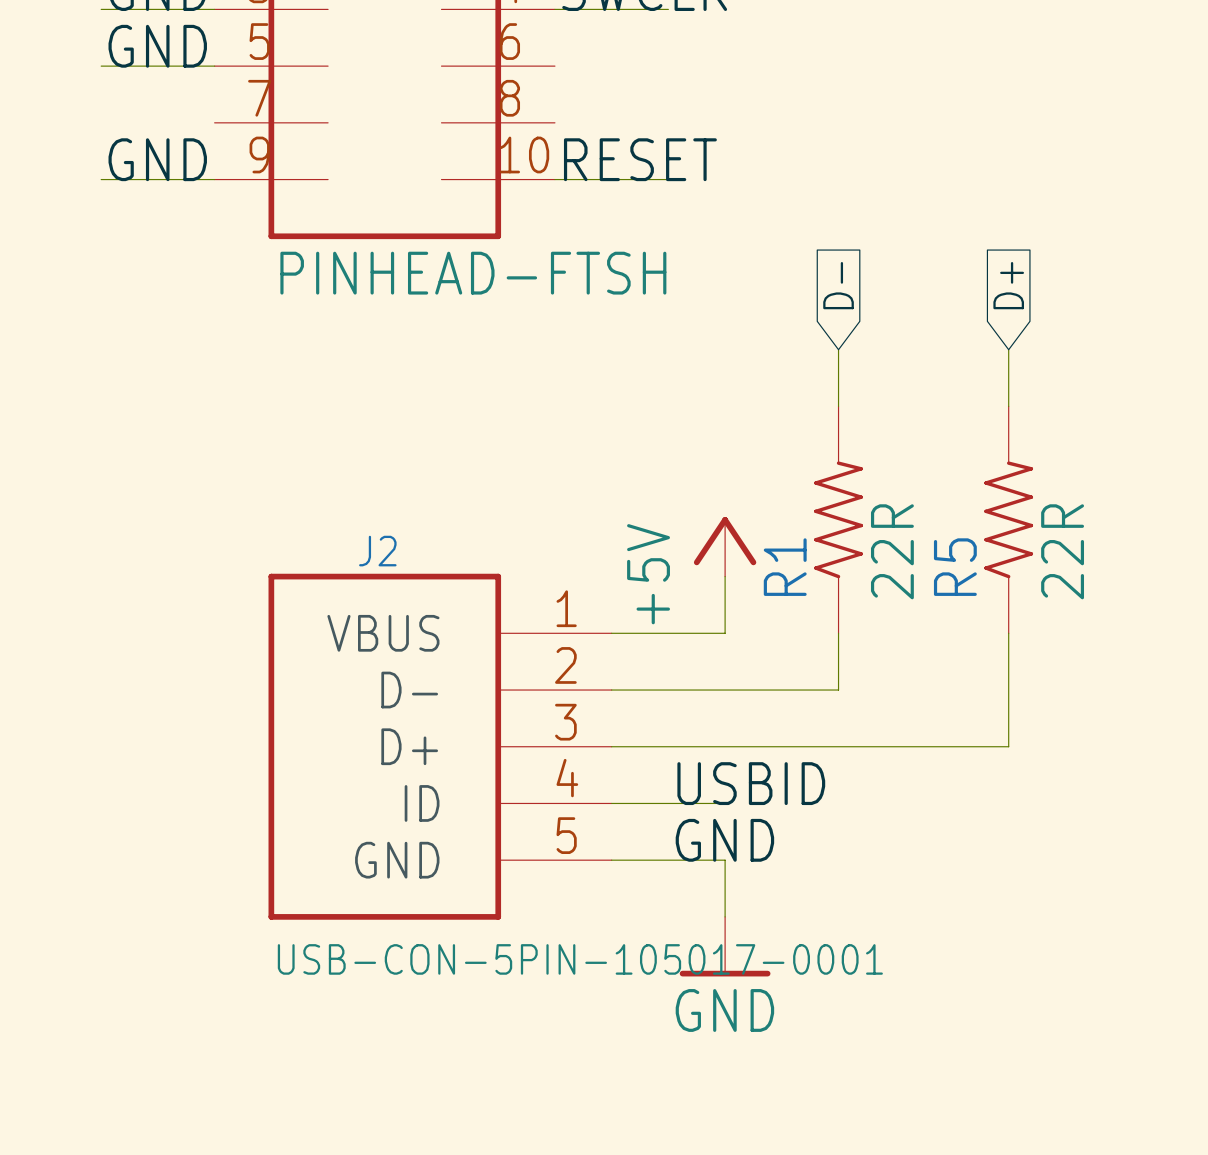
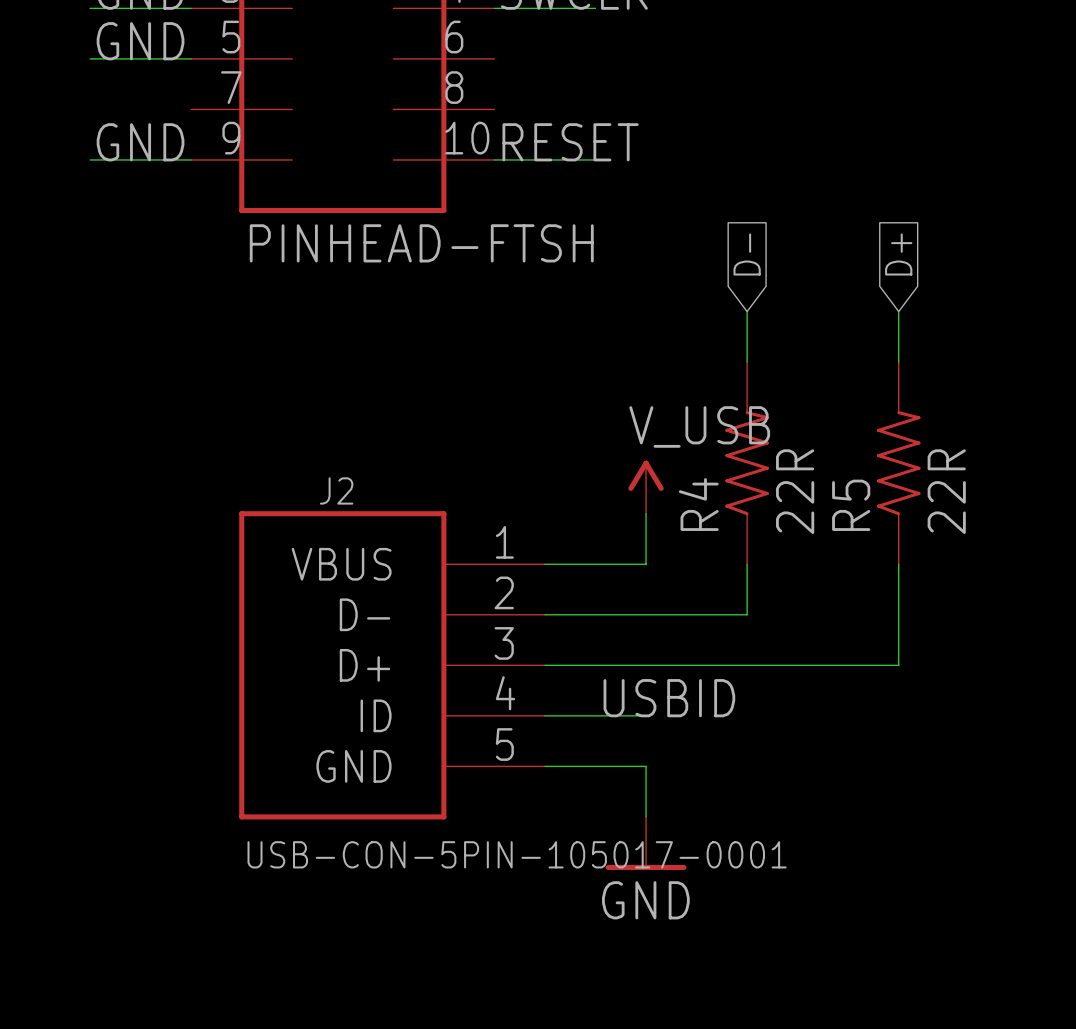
power symbol: +5V (725, 546) -> V_USB (646, 487)
R1 name: R1 (785, 567) -> R4 (698, 504)
label: GND (724, 840) -> none

